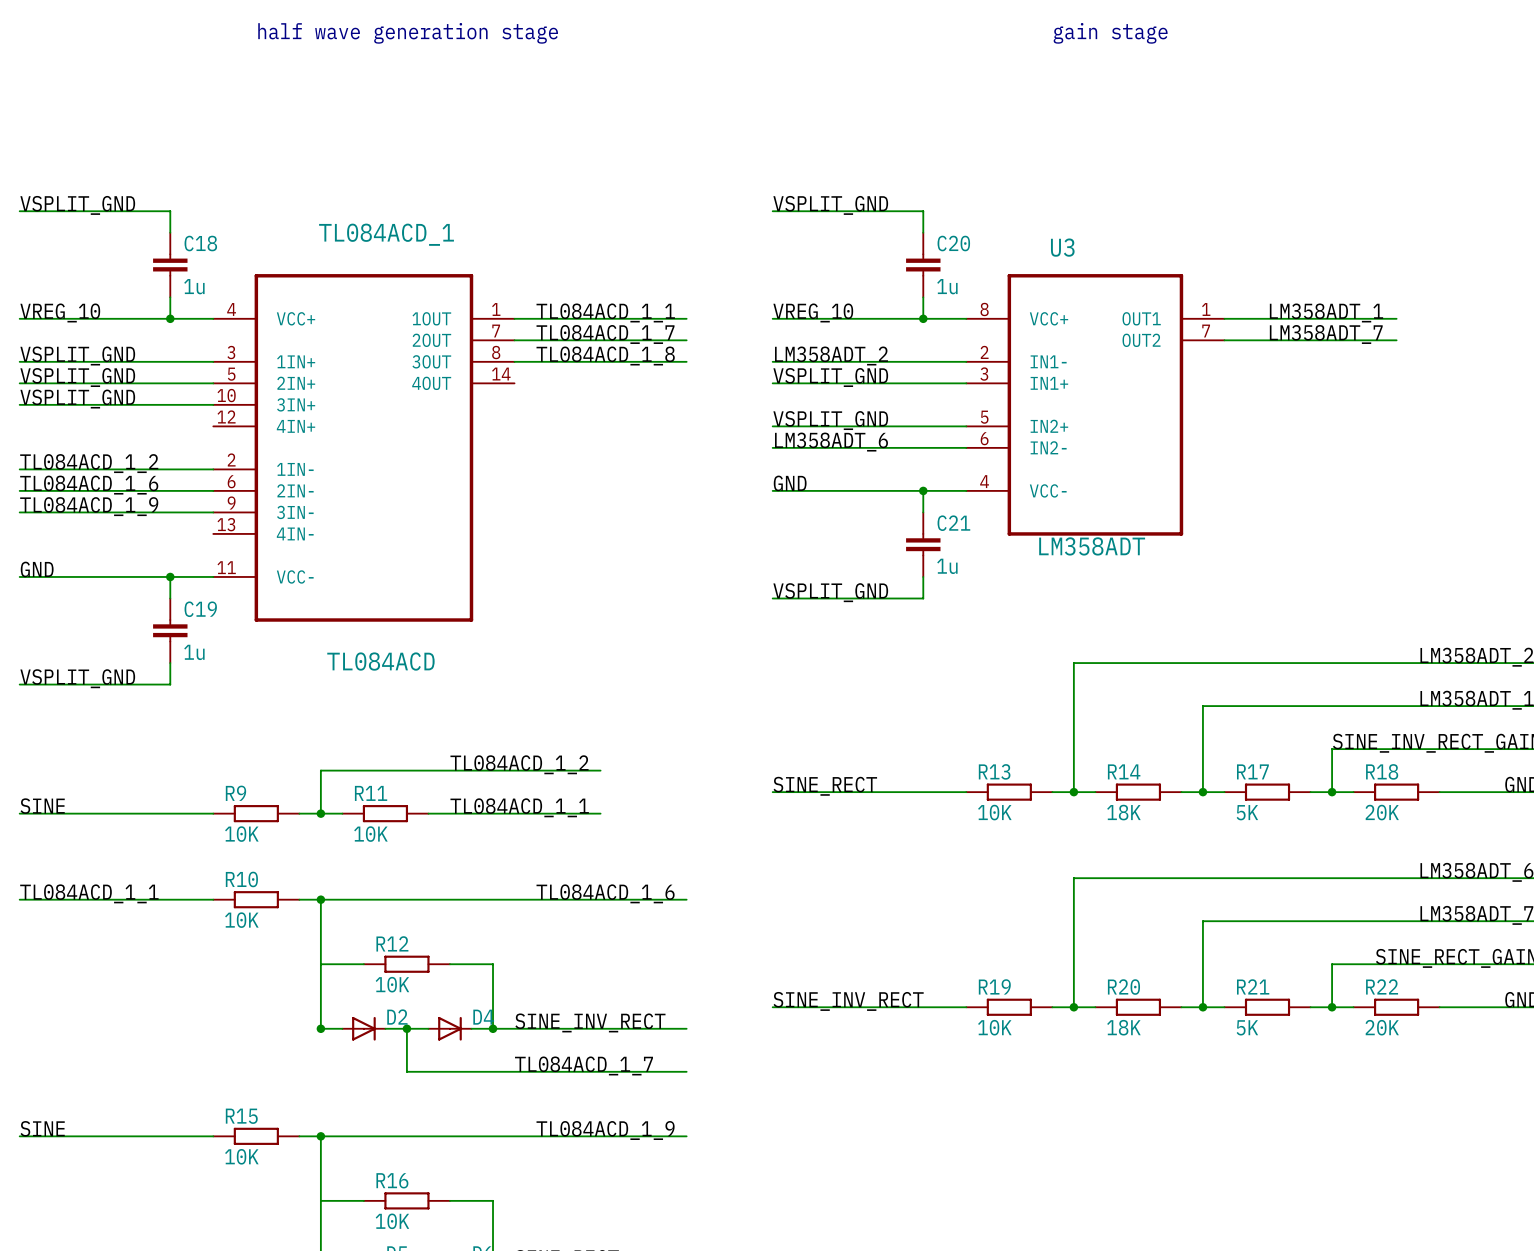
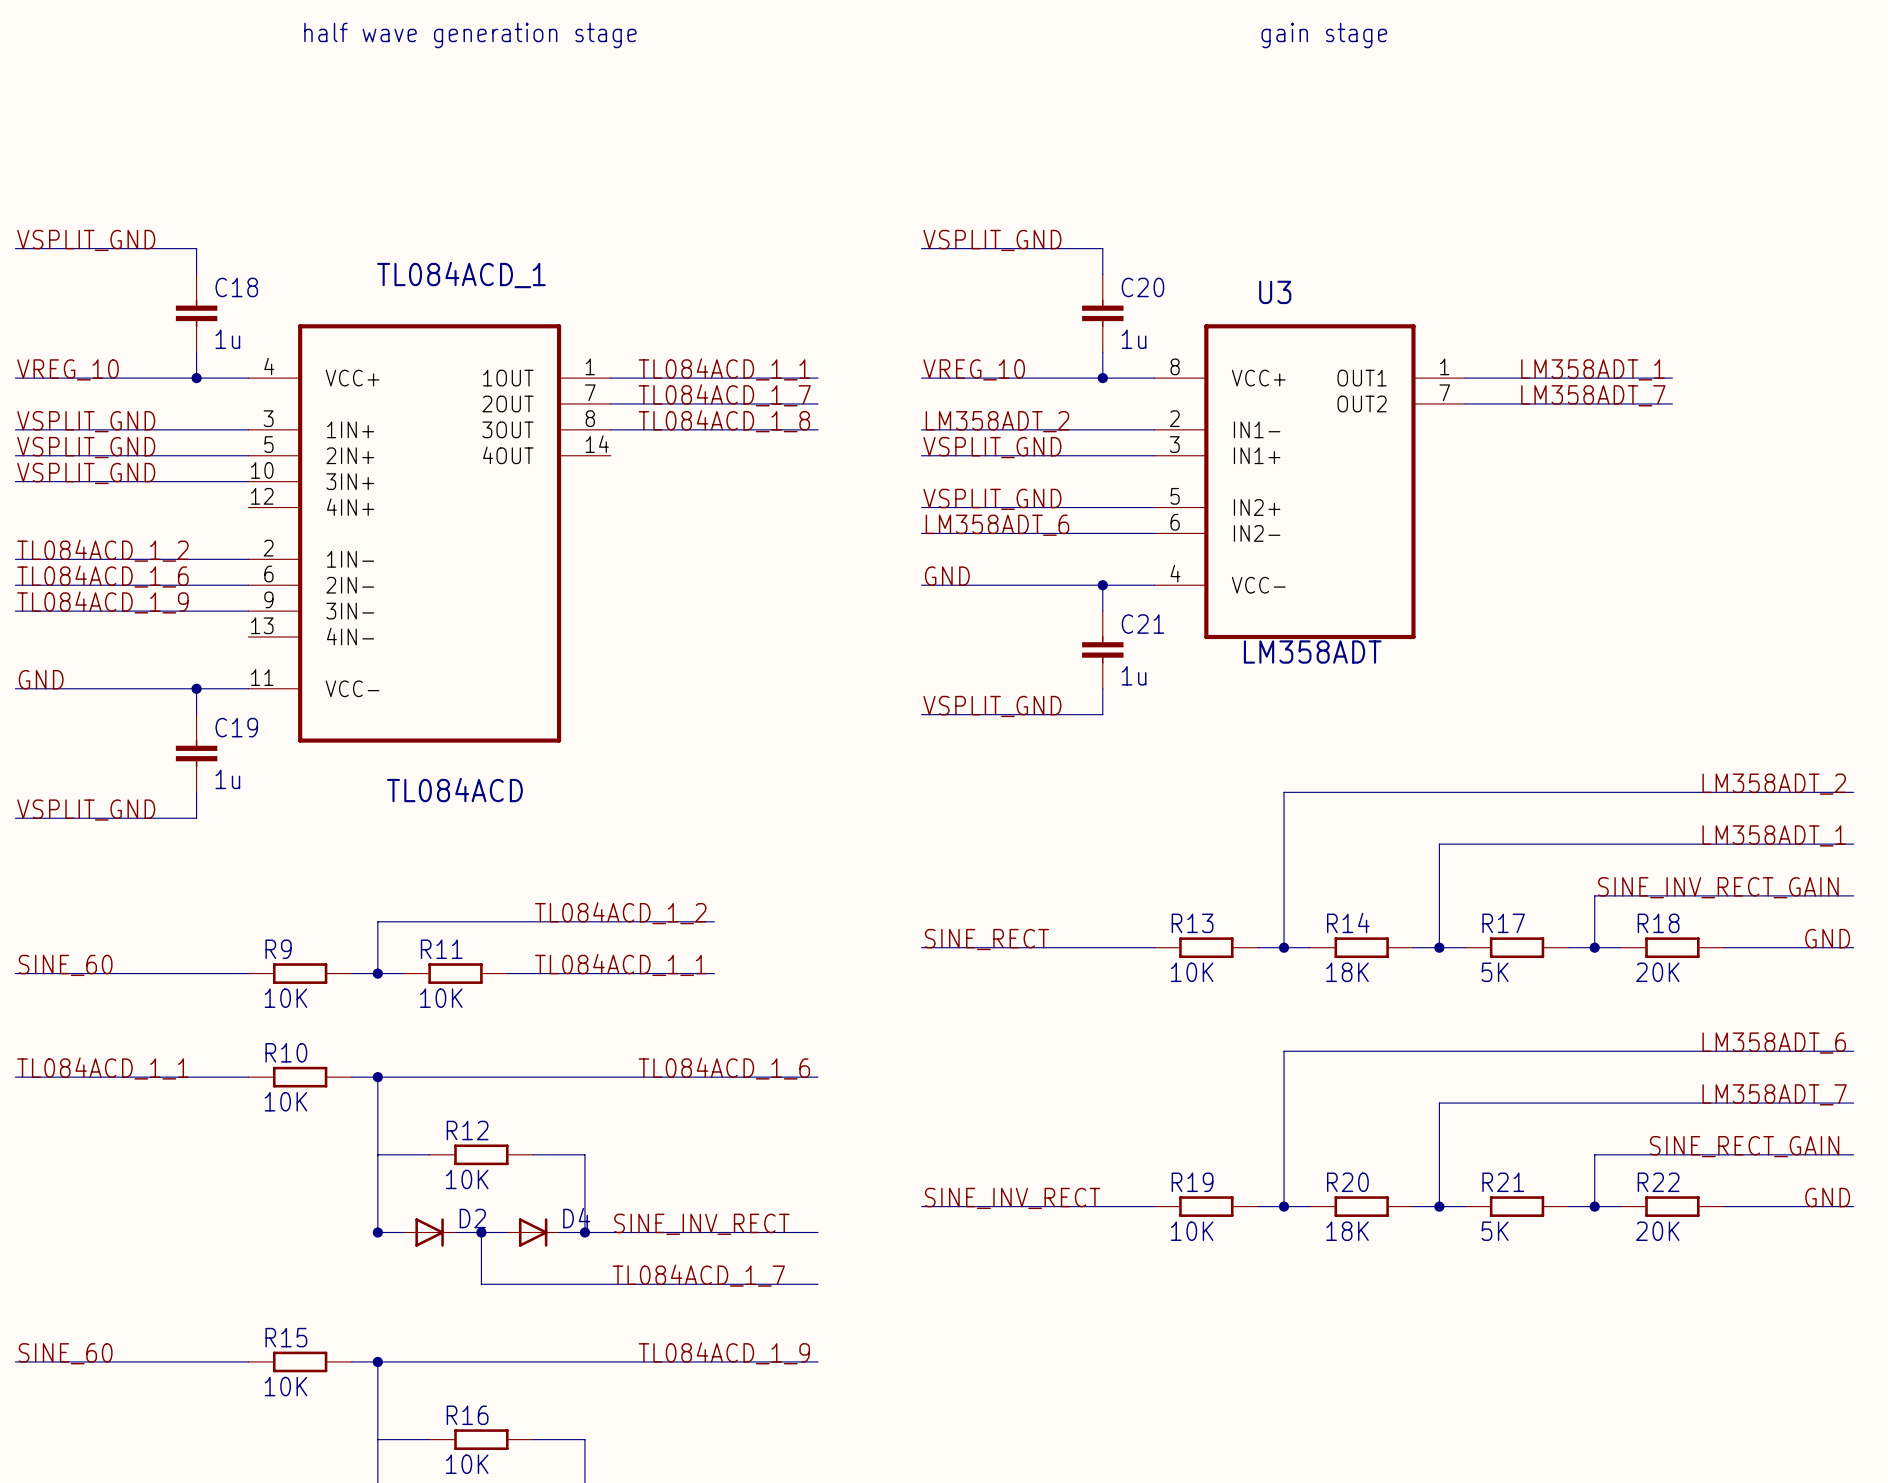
label: SINE (42, 806) -> SINE_60 (65, 965)
label: SINE (42, 1128) -> SINE_60 (65, 1353)

